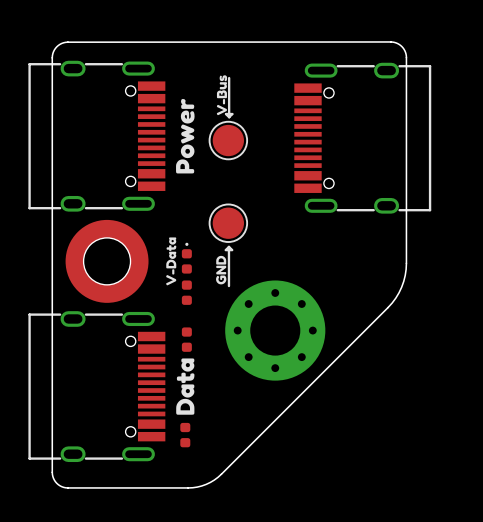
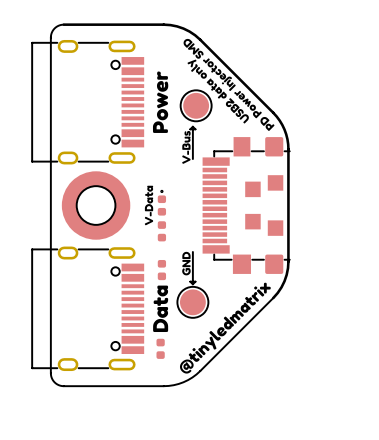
board edge: (67, 42) (390, 41) (399, 44) (404, 50) (406, 57) (406, 263) (403, 281) (392, 303) (221, 474) (210, 482) (188, 487) (65, 487) (60, 485) (54, 480) (52, 464) -> (63, 24) (163, 24) (183, 28) (200, 39) (273, 112) (284, 129) (288, 144) (288, 261) (286, 274) (277, 292) (200, 371) (183, 382) (163, 386) (62, 386) (53, 381) (50, 373)
drawing: none -> [183, 38, 275, 131]
line: (229, 78) (229, 117) -> (192, 251) (192, 284)
drawing position: (221, 95) -> (186, 147)
line: (229, 117) (226, 114) (232, 114) (229, 117) -> (192, 284) (190, 281) (195, 281) (192, 284)
part: (362, 138) -> none
part position: (228, 223) -> (192, 302)
line: (228, 246) (232, 250) (225, 250) (228, 246) -> (192, 126) (195, 129) (190, 129) (192, 126)
line: (228, 246) (228, 286) -> (192, 126) (192, 159)
part: none -> (246, 205)
drawing position: (221, 270) -> (186, 263)
part: (275, 330) -> none
drawing: none -> [179, 282, 271, 374]

